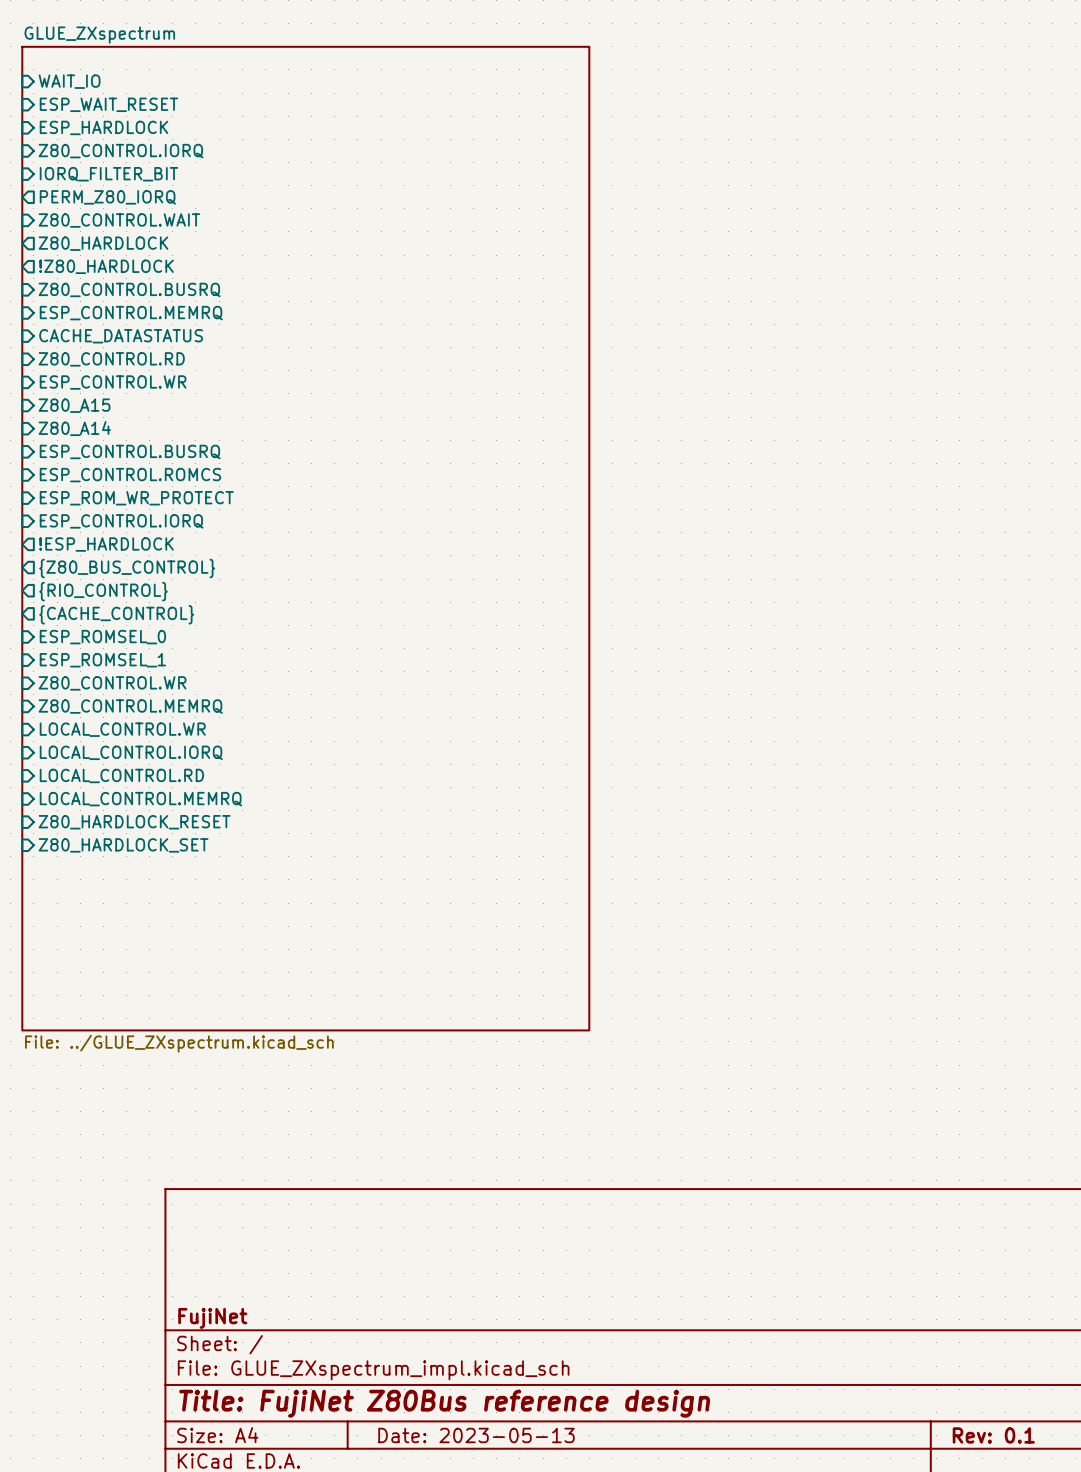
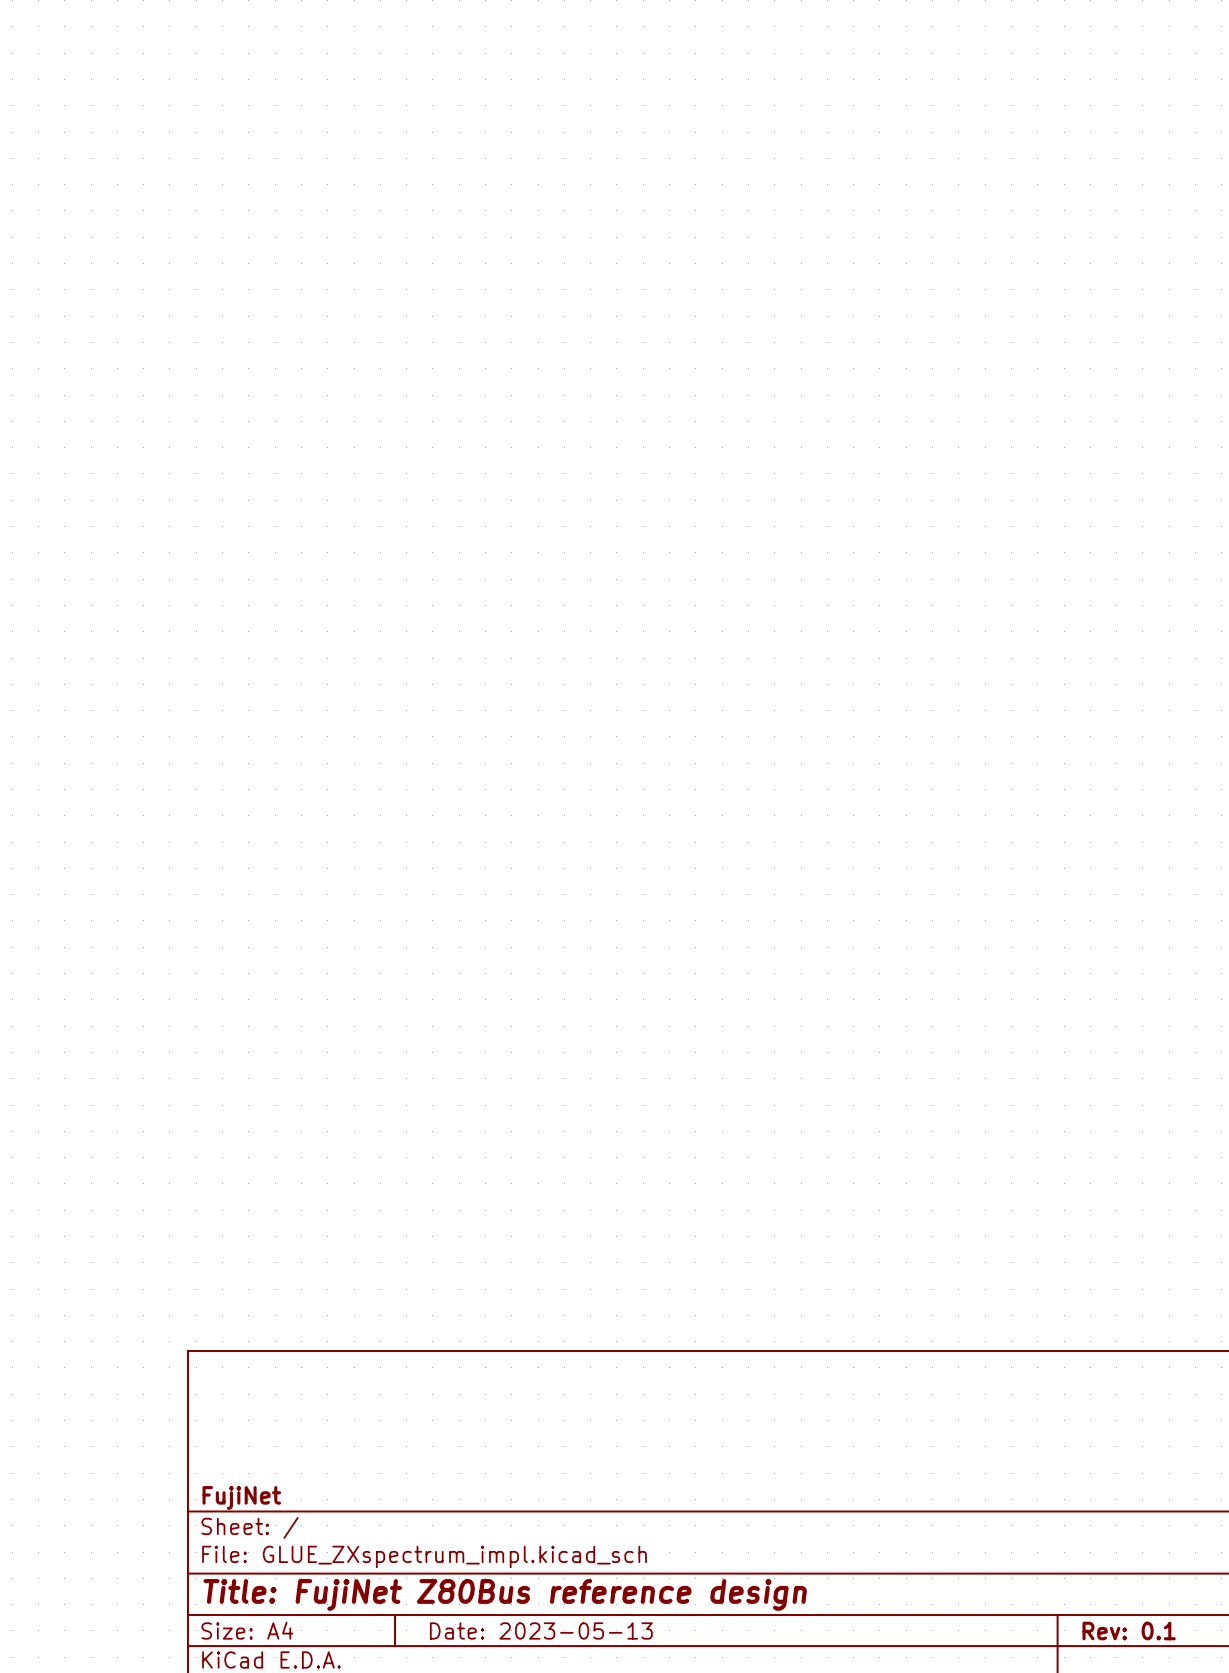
sheet pin: WAIT_IO (69, 81) -> none
sheet pin: ESP_WAIT_RESET (108, 104) -> none
sheet pin: ESP_HARDLOCK (104, 127) -> none
sheet pin: Z80_CONTROL.IORQ (121, 151) -> none
sheet pin: IORQ_FILTER_BIT (108, 174) -> none
sheet pin: PERM_Z80_IORQ (107, 197) -> none
sheet pin: Z80_CONTROL.WAIT (119, 220) -> none
sheet pin: Z80_HARDLOCK (103, 243) -> none
sheet pin: !Z80_HARDLOCK (106, 266) -> none
sheet pin: Z80_CONTROL.BUSRQ (129, 289) -> none
sheet pin: ESP_CONTROL.MEMRQ (131, 313) -> none
sheet pin: CACHE_DATASTATUS (121, 336) -> none
sheet pin: Z80_CONTROL.RD (111, 359) -> none
sheet pin: ESP_CONTROL.WR (113, 382) -> none
sheet pin: Z80_A15 (74, 405) -> none
sheet pin: Z80_A14 (74, 428) -> none
sheet pin: ESP_CONTROL.BUSRQ (130, 451) -> none
sheet pin: ESP_CONTROL.ROMCS (130, 475) -> none
sheet pin: ESP_ROM_WR_PROTECT (136, 498) -> none
sheet pin: ESP_CONTROL.IORQ (121, 521) -> none
sheet GLUE_ZXspectrum: File: ../GLUE_ZXspectrum.kicad_sch (305, 538) -> none
sheet pin: !ESP_HARDLOCK (106, 544) -> none
sheet pin: {Z80_BUS_CONTROL} (127, 568) -> none
sheet pin: {RIO_CONTROL} (103, 591) -> none
sheet pin: {CACHE_CONTROL} (116, 614) -> none
sheet pin: ESP_ROMSEL_0 (102, 637) -> none
sheet pin: ESP_ROMSEL_1 (102, 660) -> none
sheet pin: Z80_CONTROL.WR (112, 683) -> none
sheet pin: Z80_CONTROL.MEMRQ (130, 706) -> none
sheet pin: LOCAL_CONTROL.WR (122, 729) -> none
sheet pin: LOCAL_CONTROL.IORQ (131, 752) -> none
sheet pin: LOCAL_CONTROL.RD (121, 775) -> none
sheet pin: LOCAL_CONTROL.MEMRQ (140, 799) -> none
sheet pin: Z80_HARDLOCK_RESET (134, 822) -> none
sheet pin: Z80_HARDLOCK_SET (123, 845) -> none

